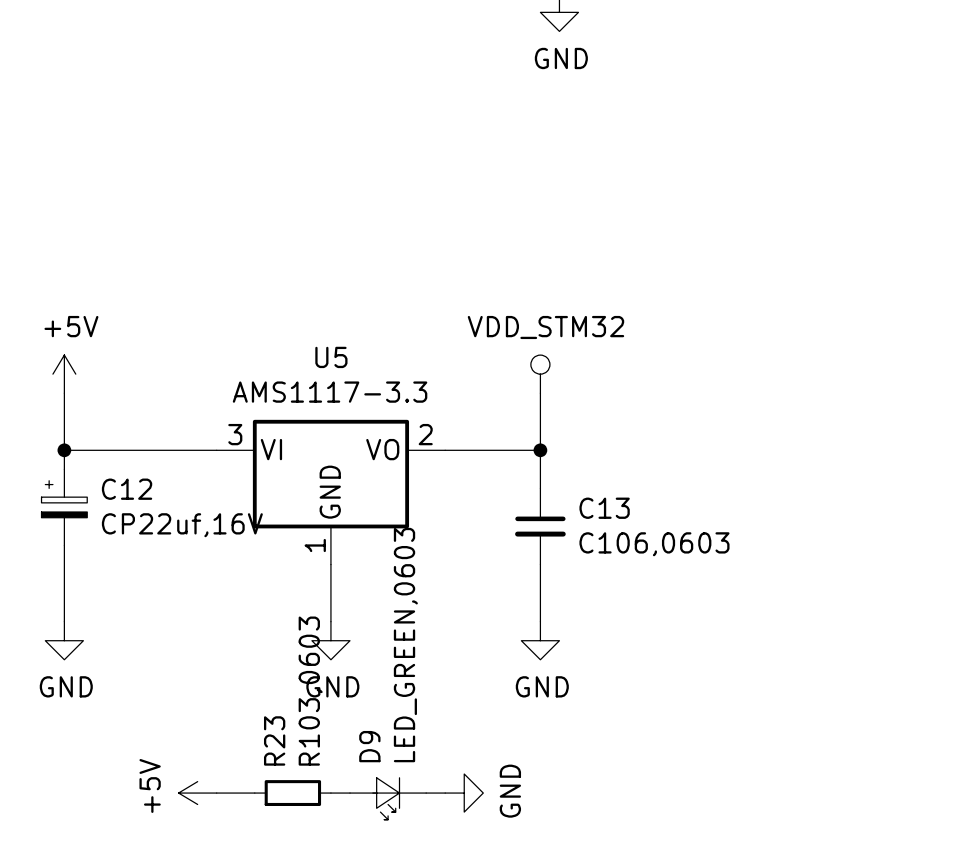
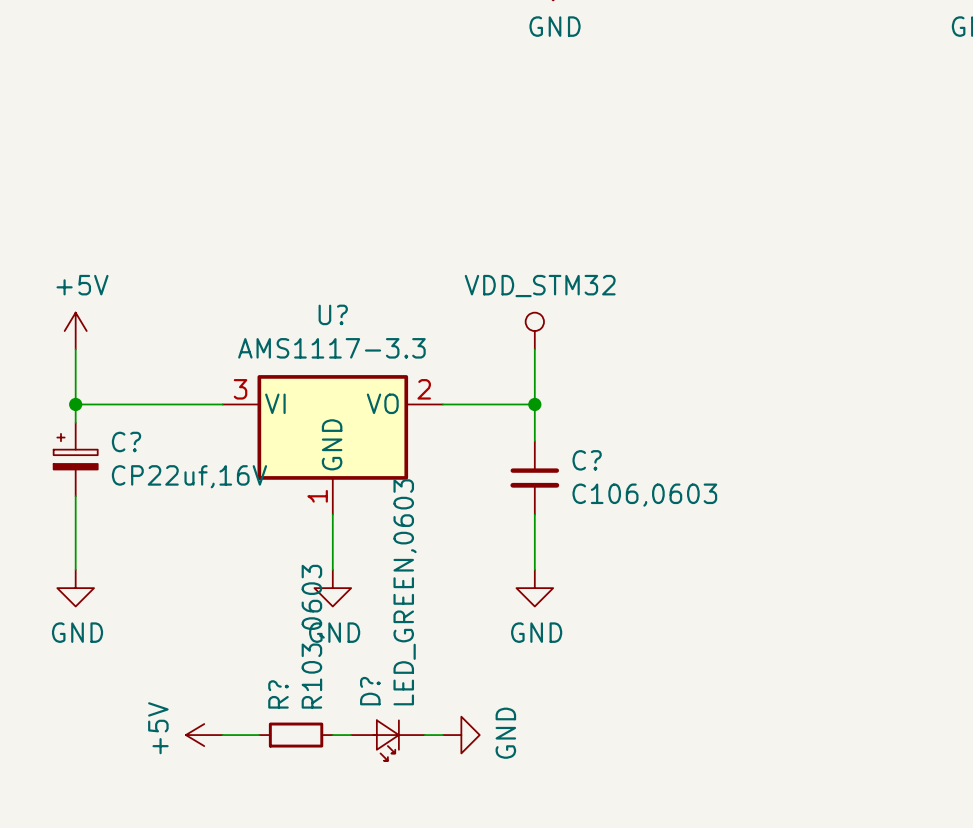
U5 name: U5 (331, 357) -> U? (333, 314)
C12 name: C12 (127, 489) -> C? (126, 441)
C13 name: C13 (604, 508) -> C? (587, 460)
R23 name: R23 (274, 740) -> R? (278, 694)
D9 name: D9 (369, 746) -> D? (370, 691)

